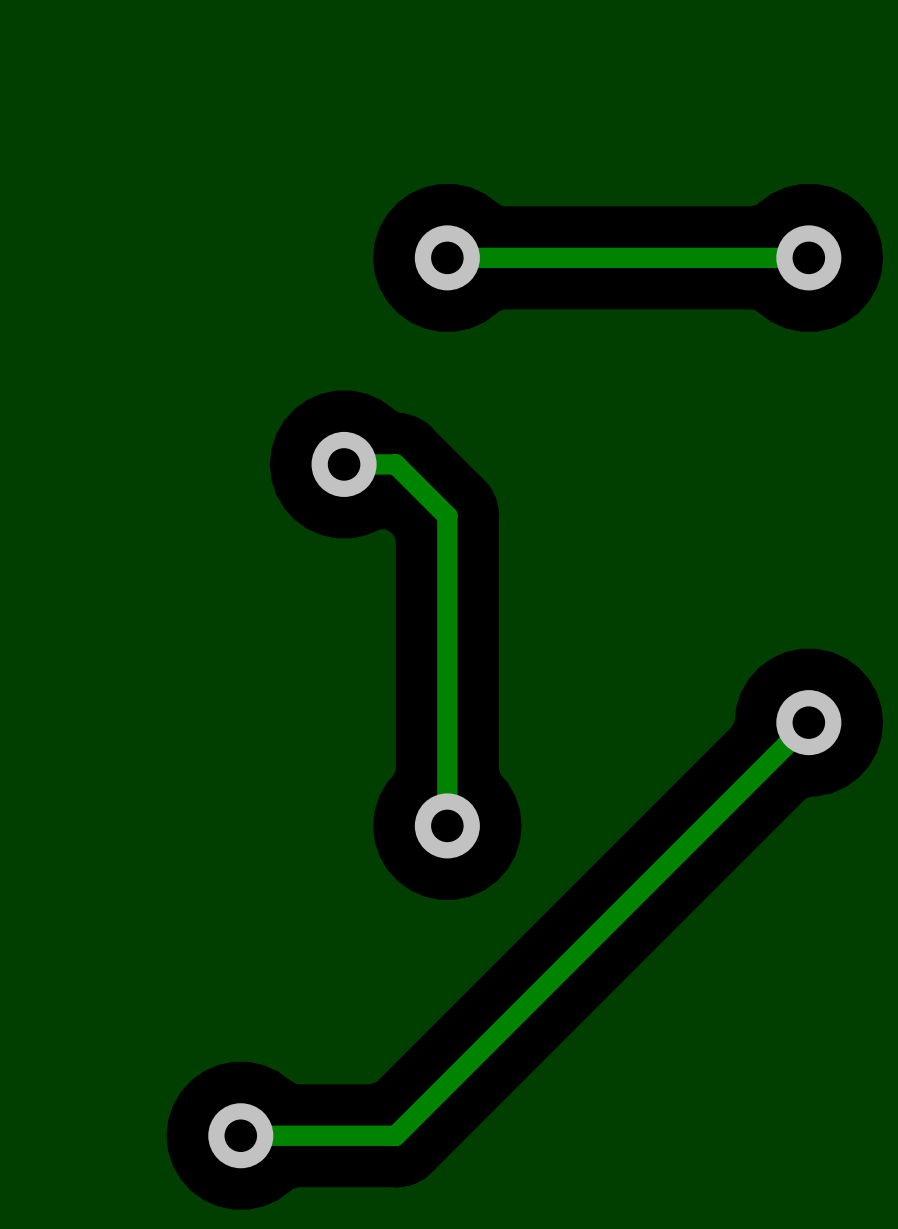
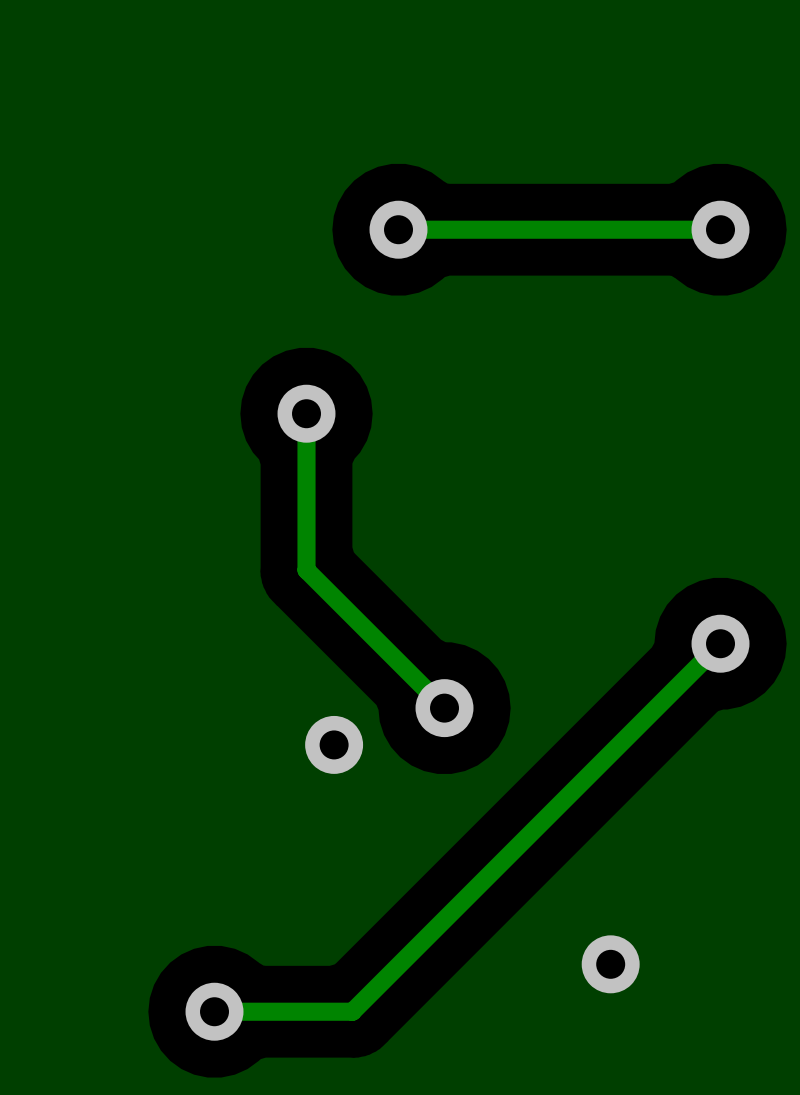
track: (344, 464) (395, 464) (447, 516) (447, 825) -> (306, 413) (306, 570) (444, 708)
via position: (447, 825) -> (444, 708)
via: none -> (334, 744)
via: none -> (610, 964)

